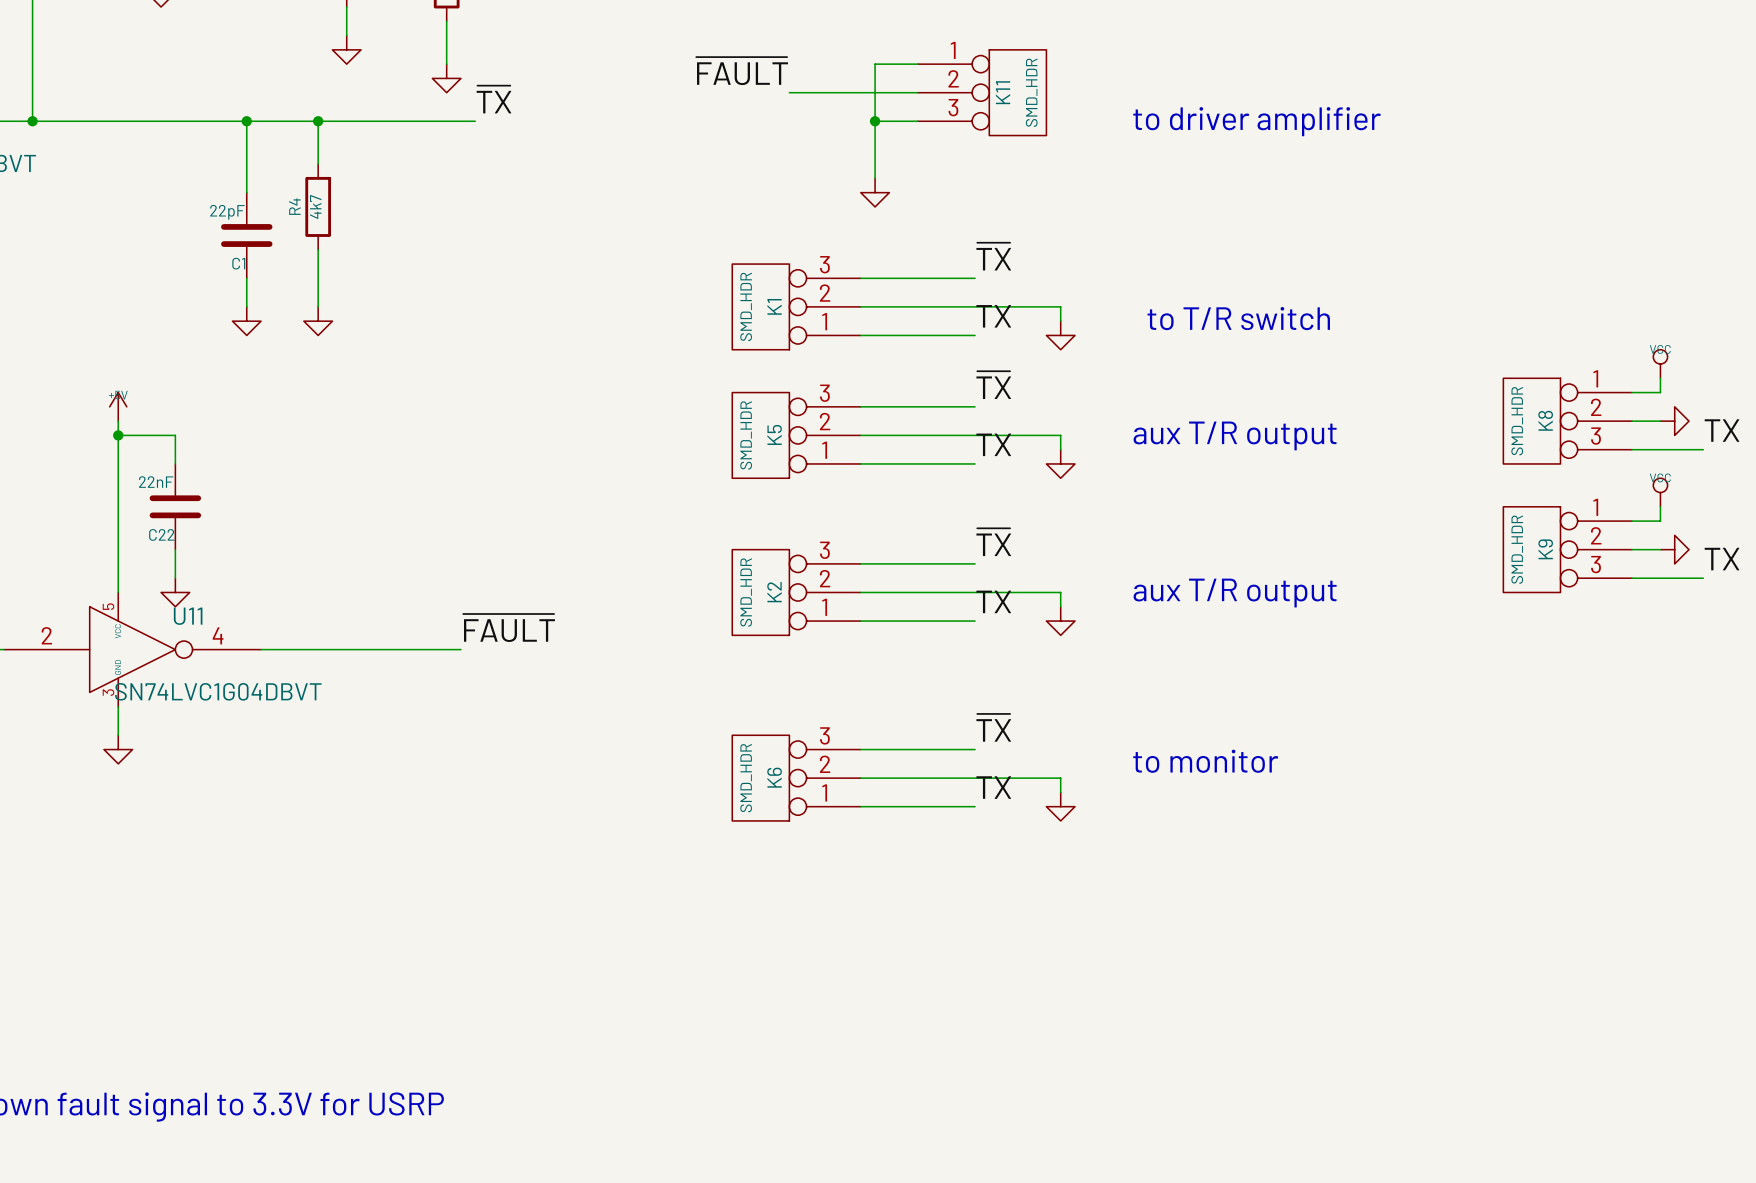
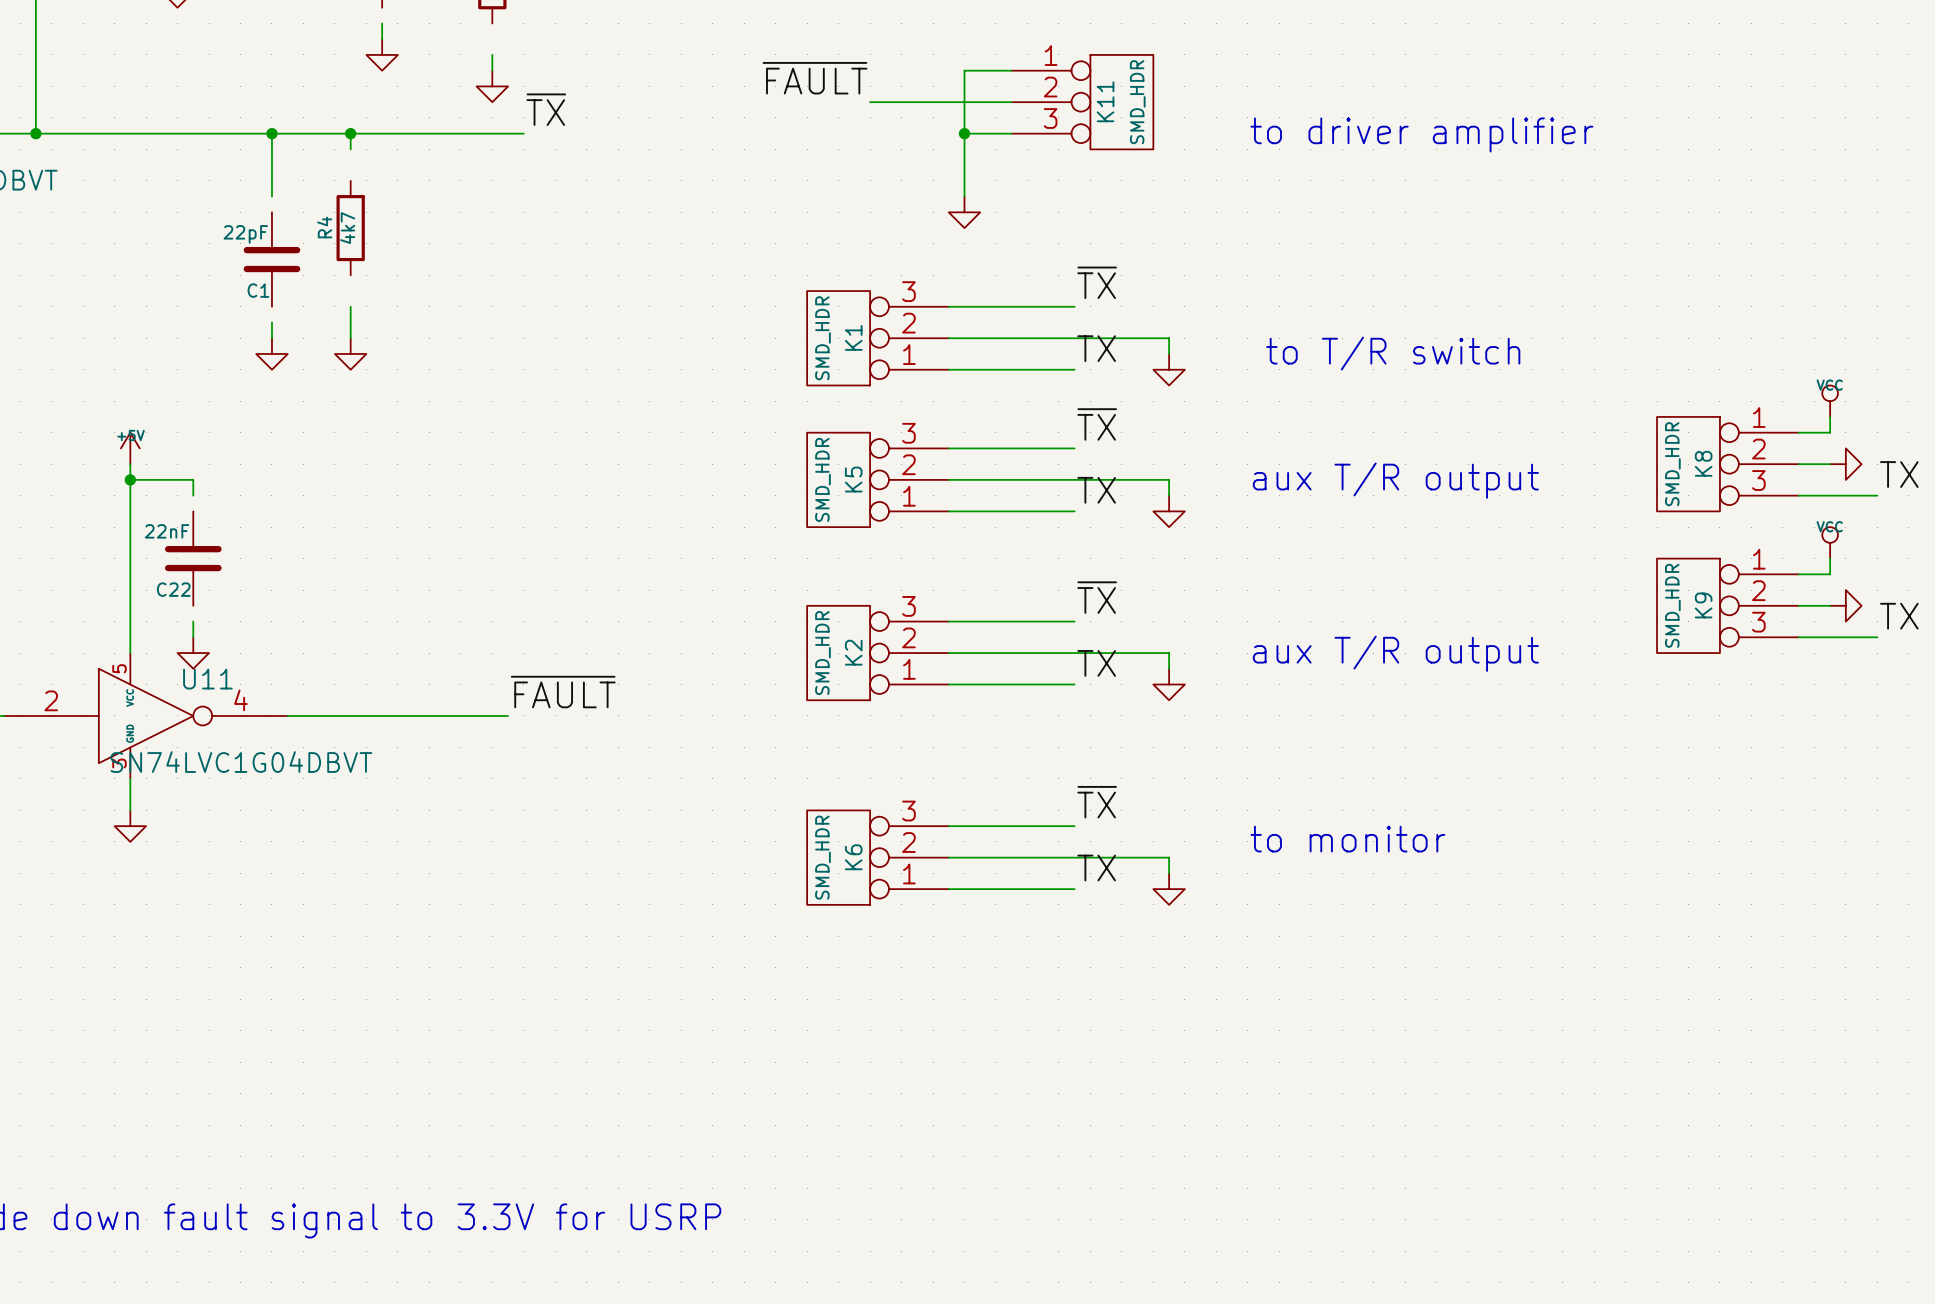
wire: (346, 7) (346, 21) -> none
wire: (446, 21) (446, 49) -> none
wire: (318, 135) (318, 164) -> none
wire: (246, 178) (246, 192) -> none
wire: (318, 249) (318, 278) -> none
wire: (246, 278) (246, 292) -> none
wire: (175, 449) (175, 463) -> none
wire: (175, 549) (175, 563) -> none

